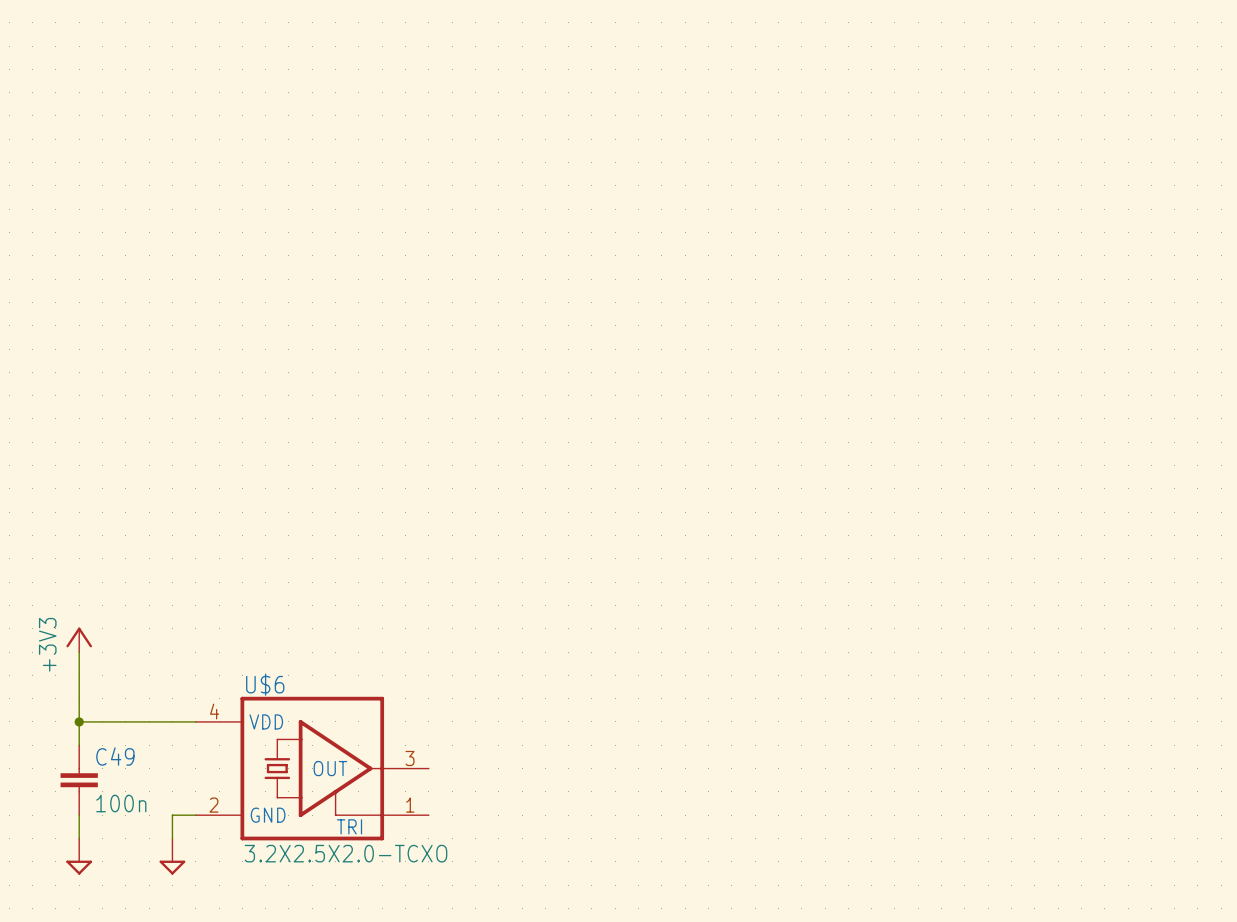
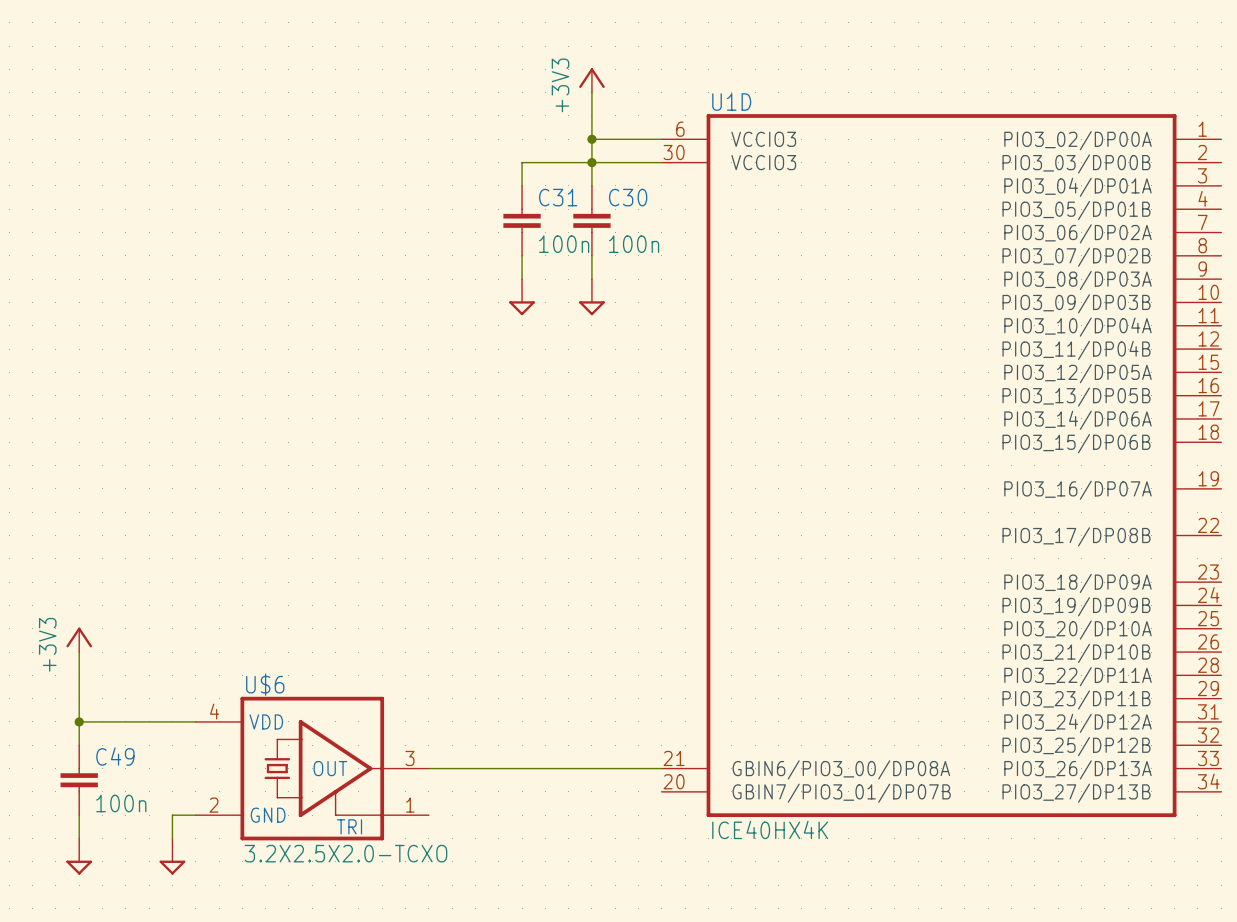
power symbol: none -> +3V3 (591, 80)
wire: none -> (591, 92) (591, 185)
wire: none -> (591, 139) (661, 139)
junction: none -> (591, 139)
junction: none -> (591, 162)
wire: none -> (661, 162) (522, 162) (522, 185)
C31: none -> 100n (522, 220)
C30: none -> 100n (591, 220)
wire: none -> (522, 255) (522, 279)
wire: none -> (591, 255) (591, 279)
power symbol: none -> (522, 297)
power symbol: none -> (591, 297)
U1D: none -> ICE40HX4K (941, 465)
wire: none -> (428, 768) (661, 768)

